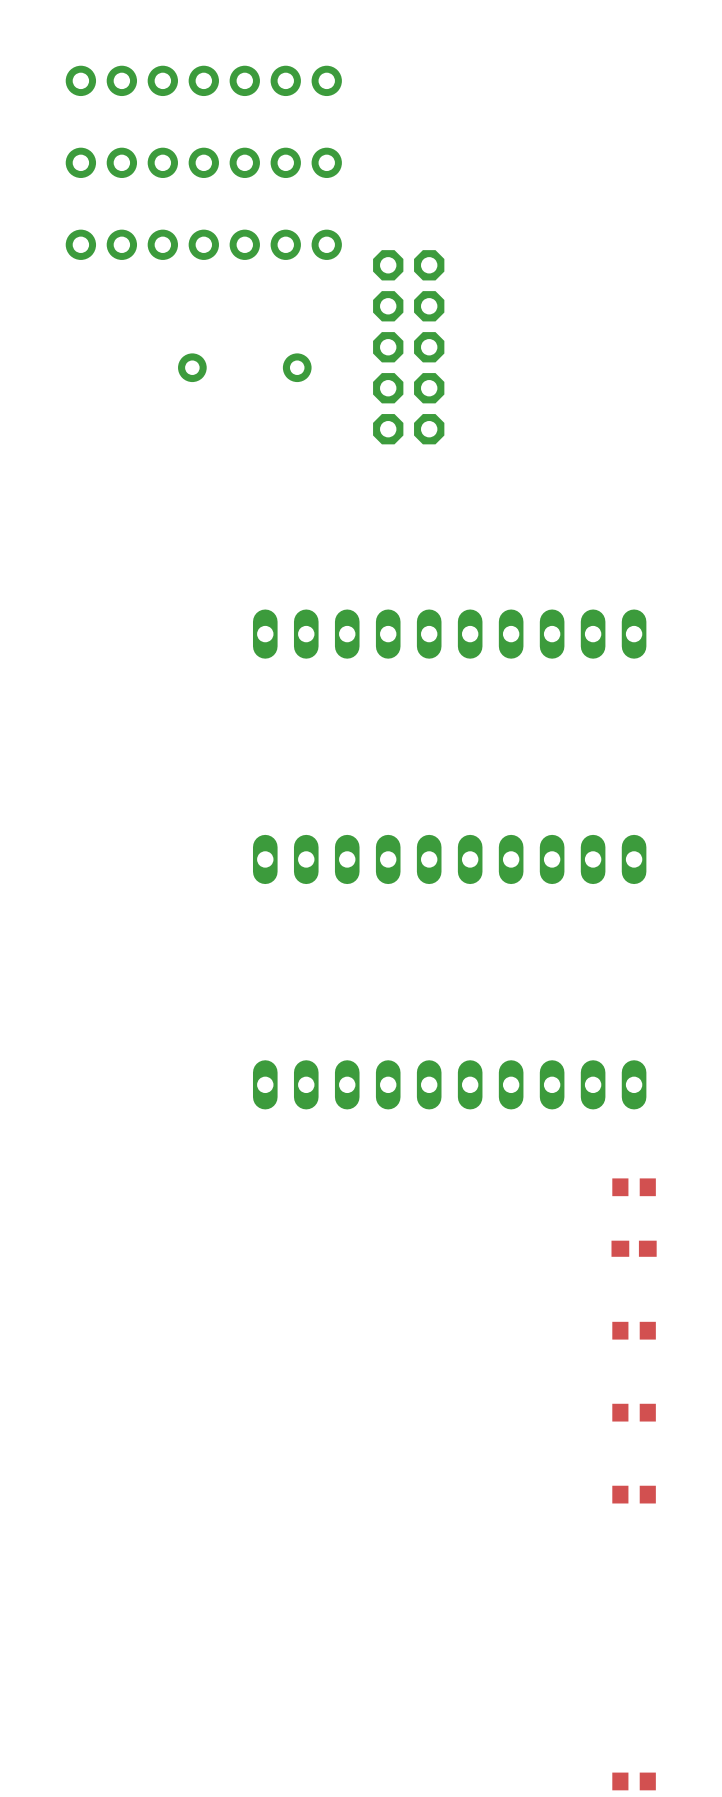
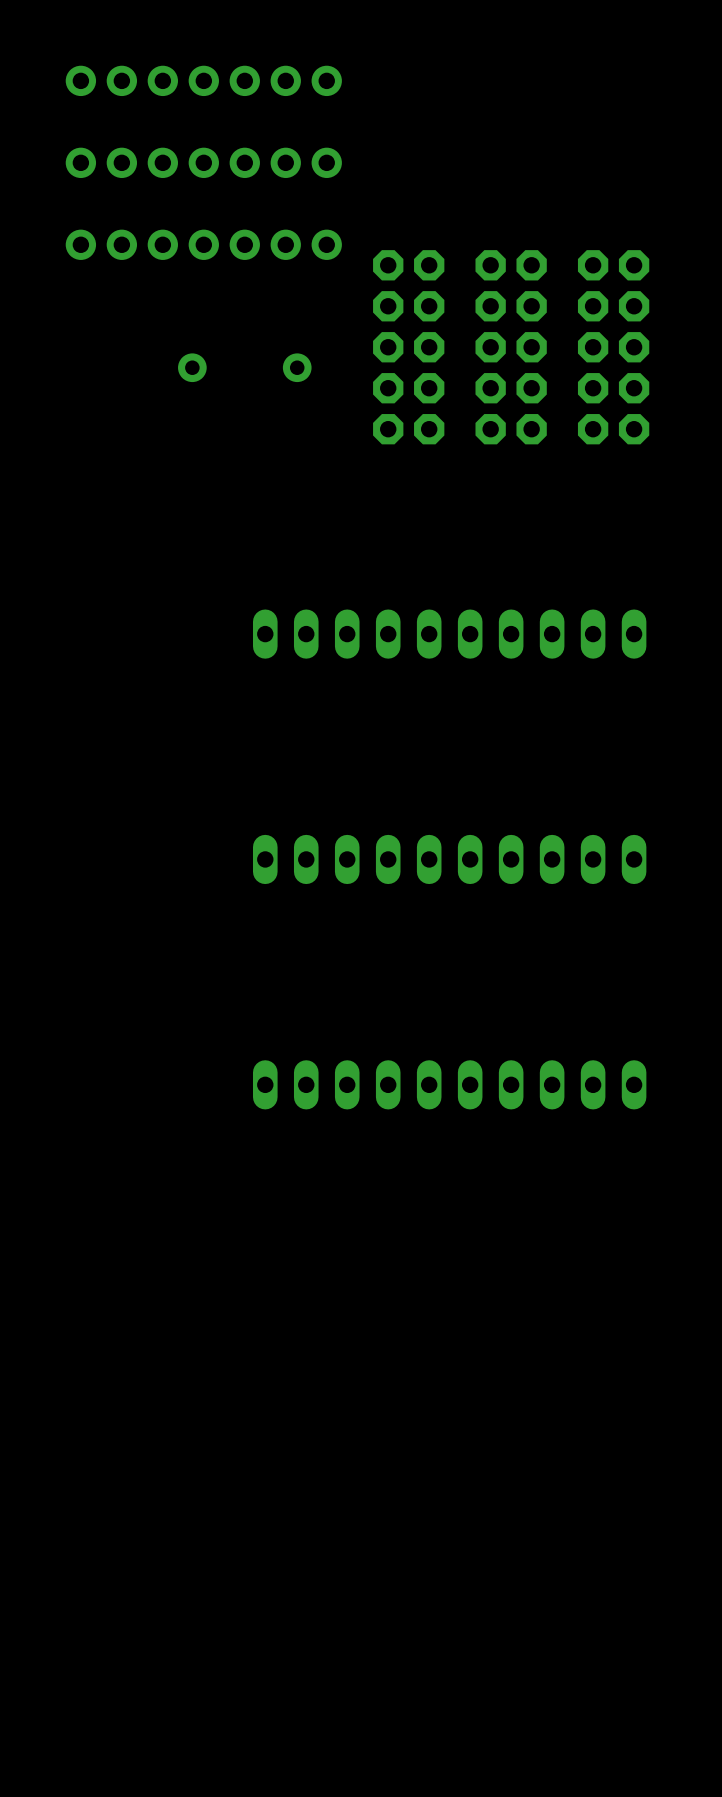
part: none -> (511, 347)
part: none -> (613, 347)
part: (634, 1187) -> none
part: (634, 1248) -> none
part: (634, 1330) -> none
part: (634, 1412) -> none
part: (634, 1494) -> none
part: (634, 1781) -> none

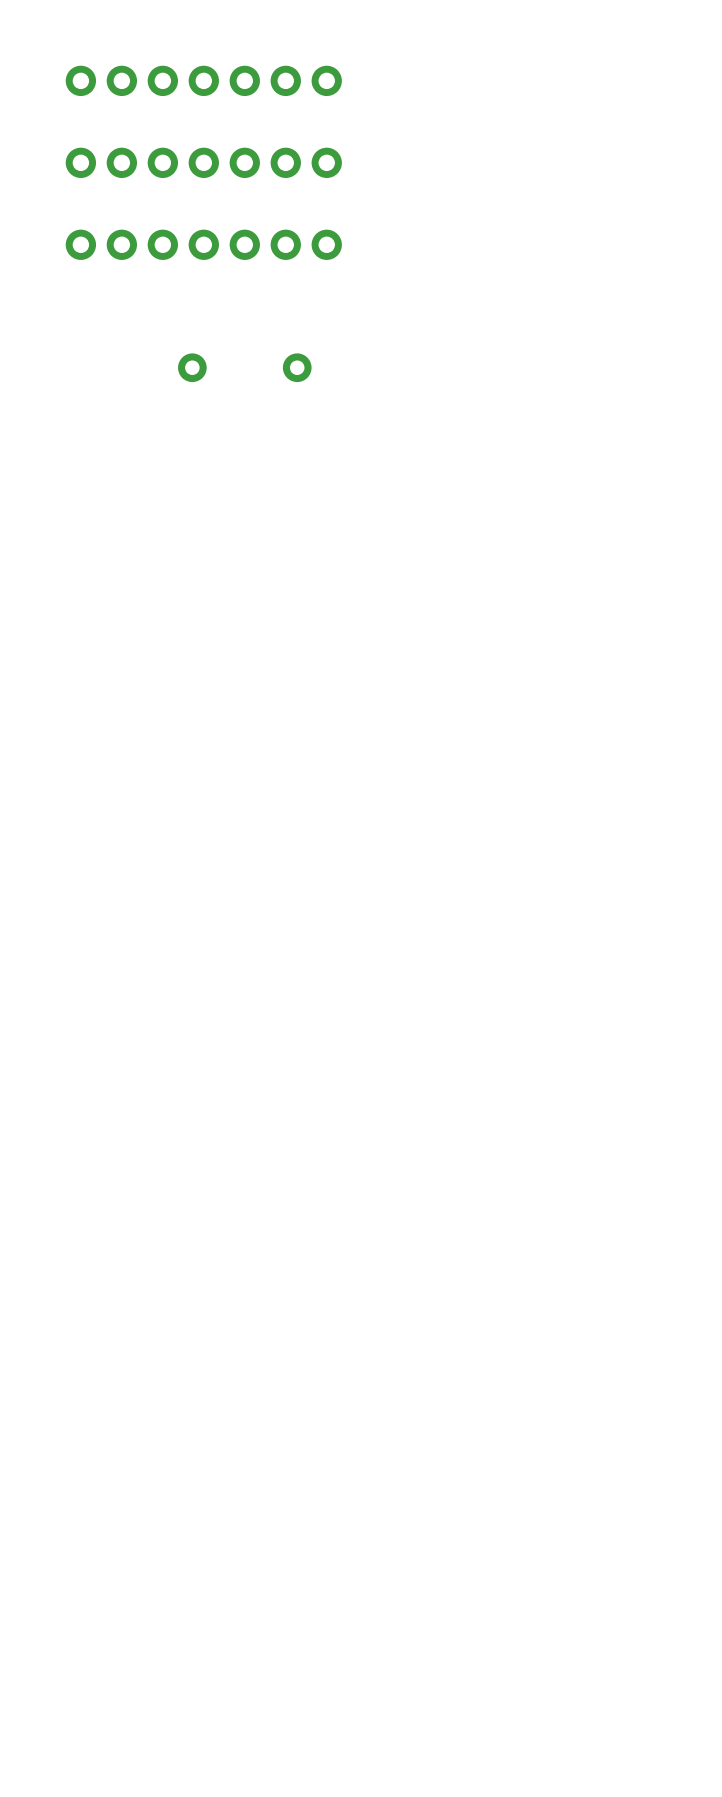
part: (408, 347) -> none
part: (511, 347) -> none
part: (613, 347) -> none
part: (449, 634) -> none
part: (449, 859) -> none
part: (449, 1084) -> none

